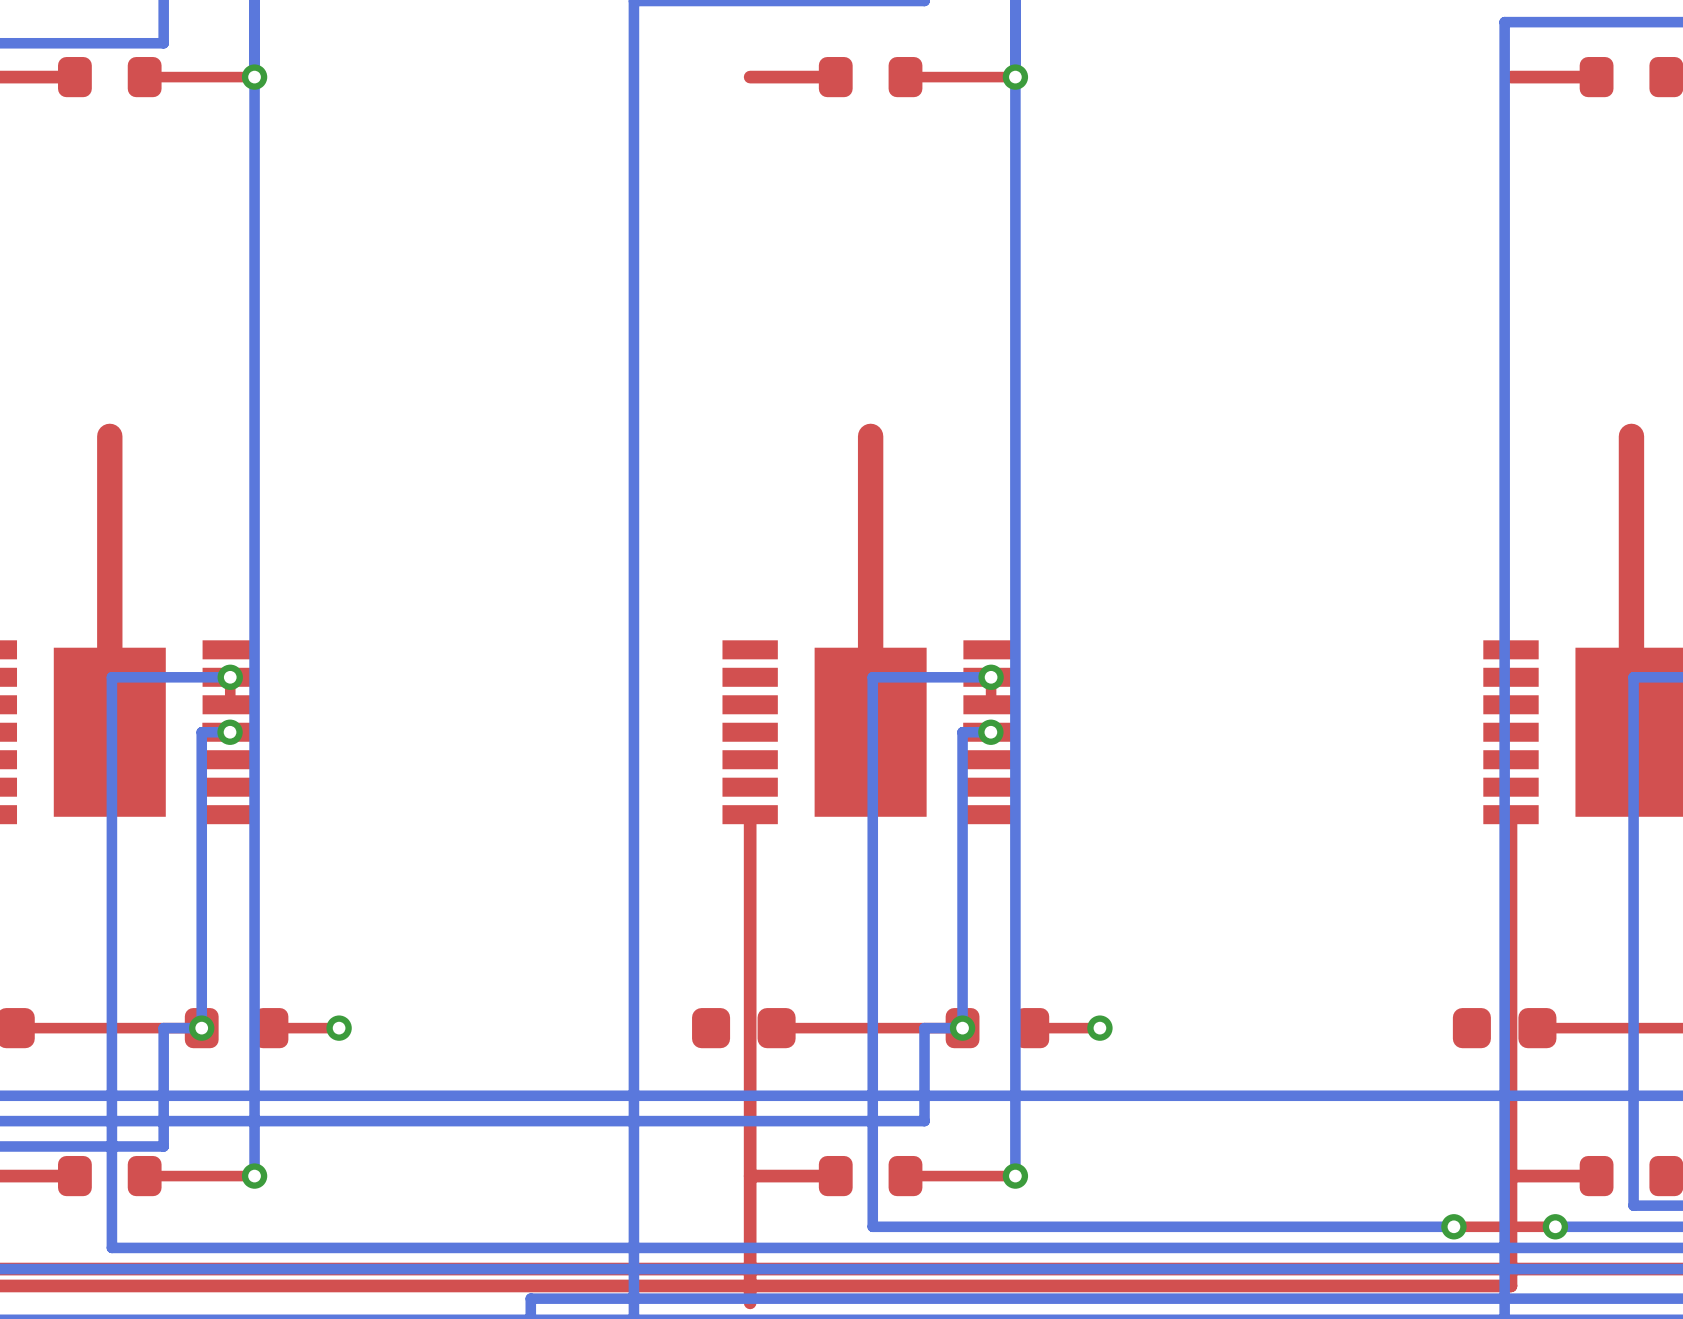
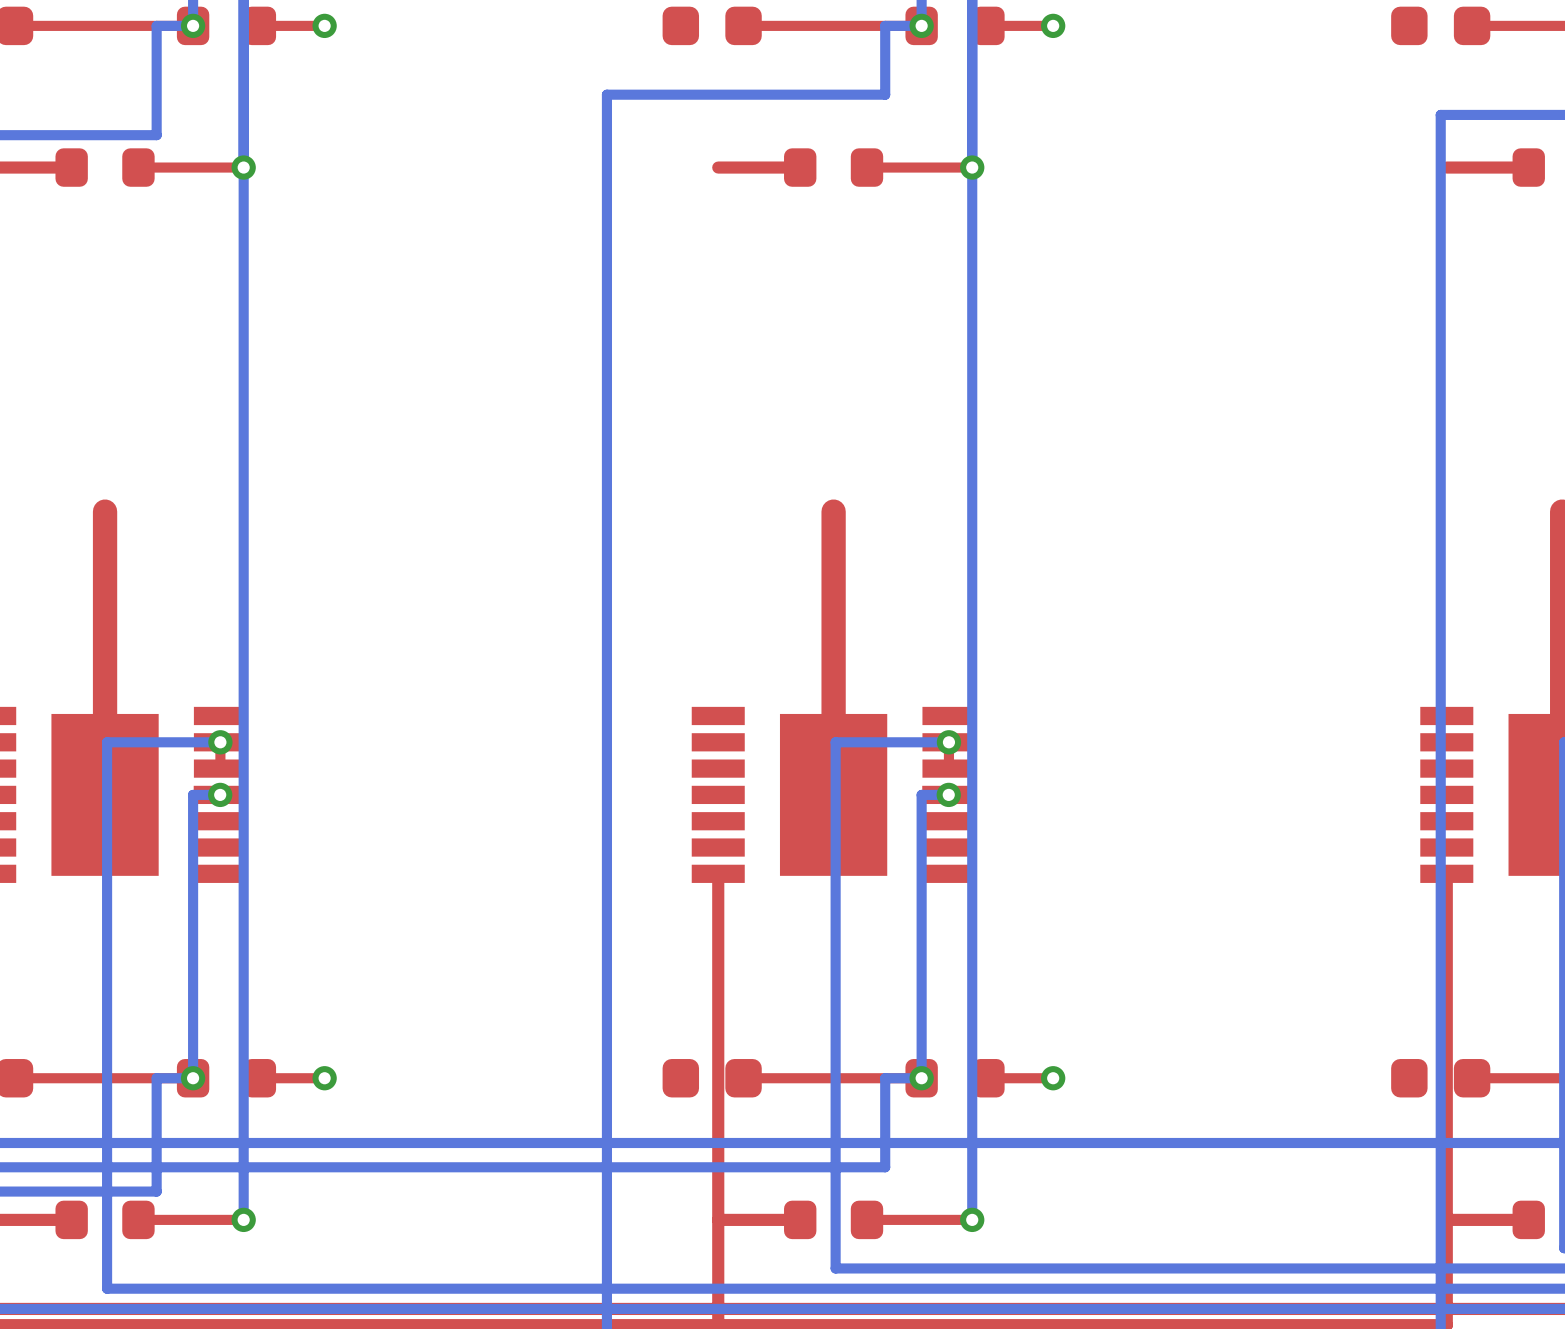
via: (1453, 1226) -> none
top track: (1555, 1226) (1453, 1226) -> none
bottom track: none -> (1489, 1268) (1392, 1268)
via: (1555, 1226) -> none

